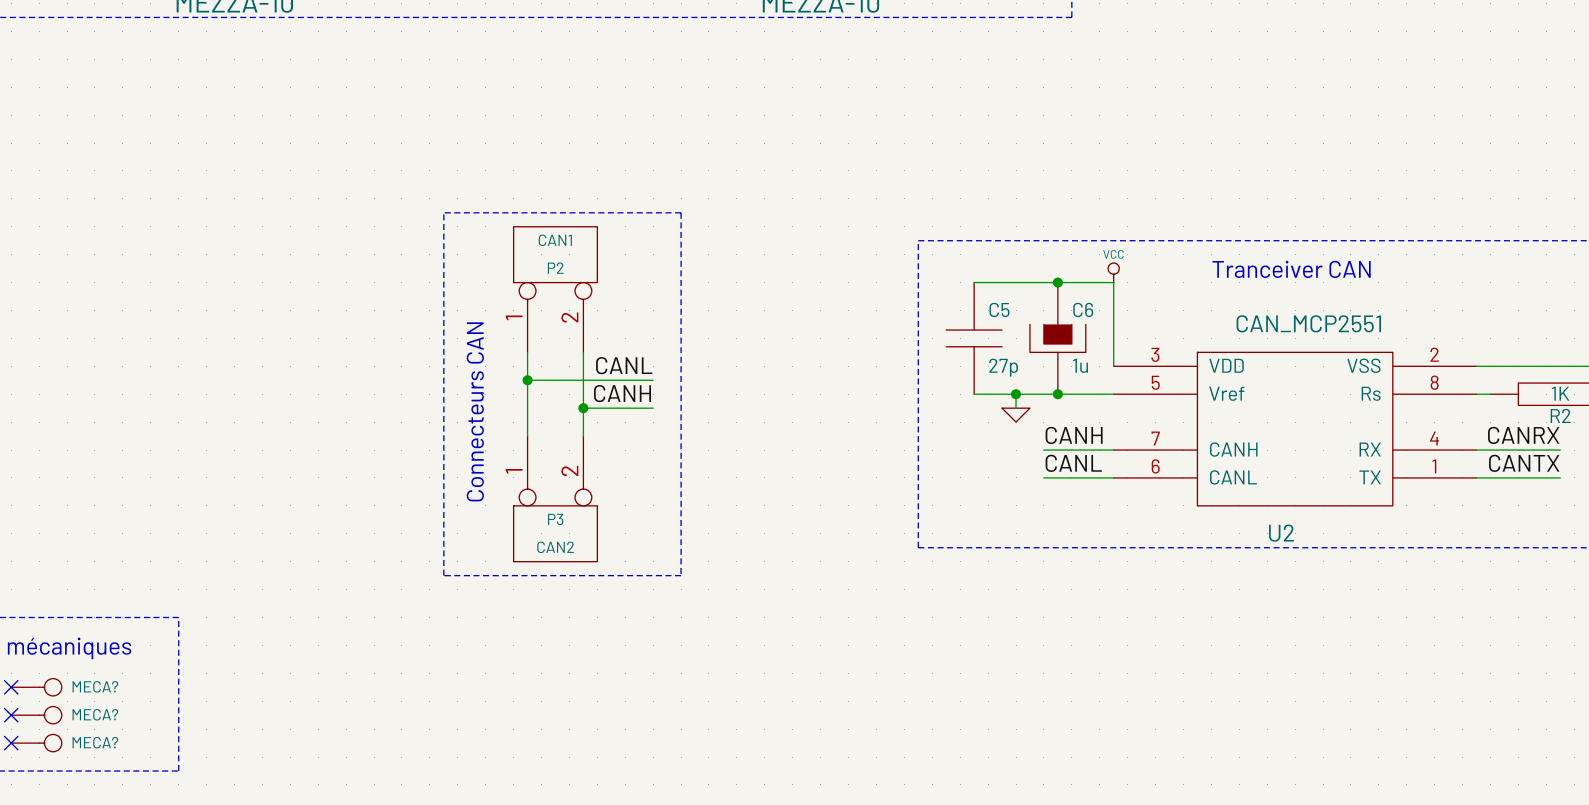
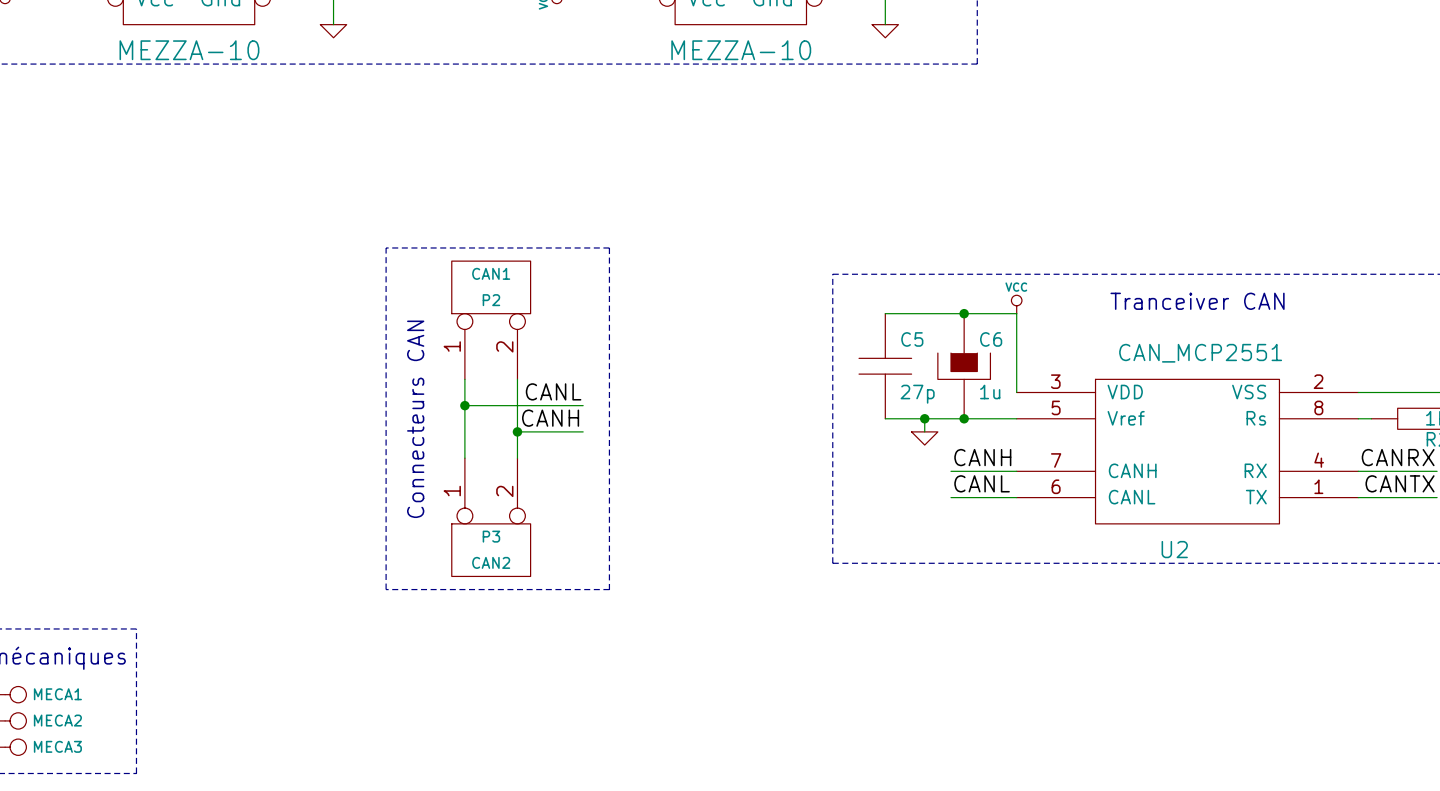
MECA? name: MECA? (95, 686) -> MECA1 (57, 694)
MECA? name: MECA? (95, 714) -> MECA2 (57, 720)
MECA? name: MECA? (95, 742) -> MECA3 (57, 746)

